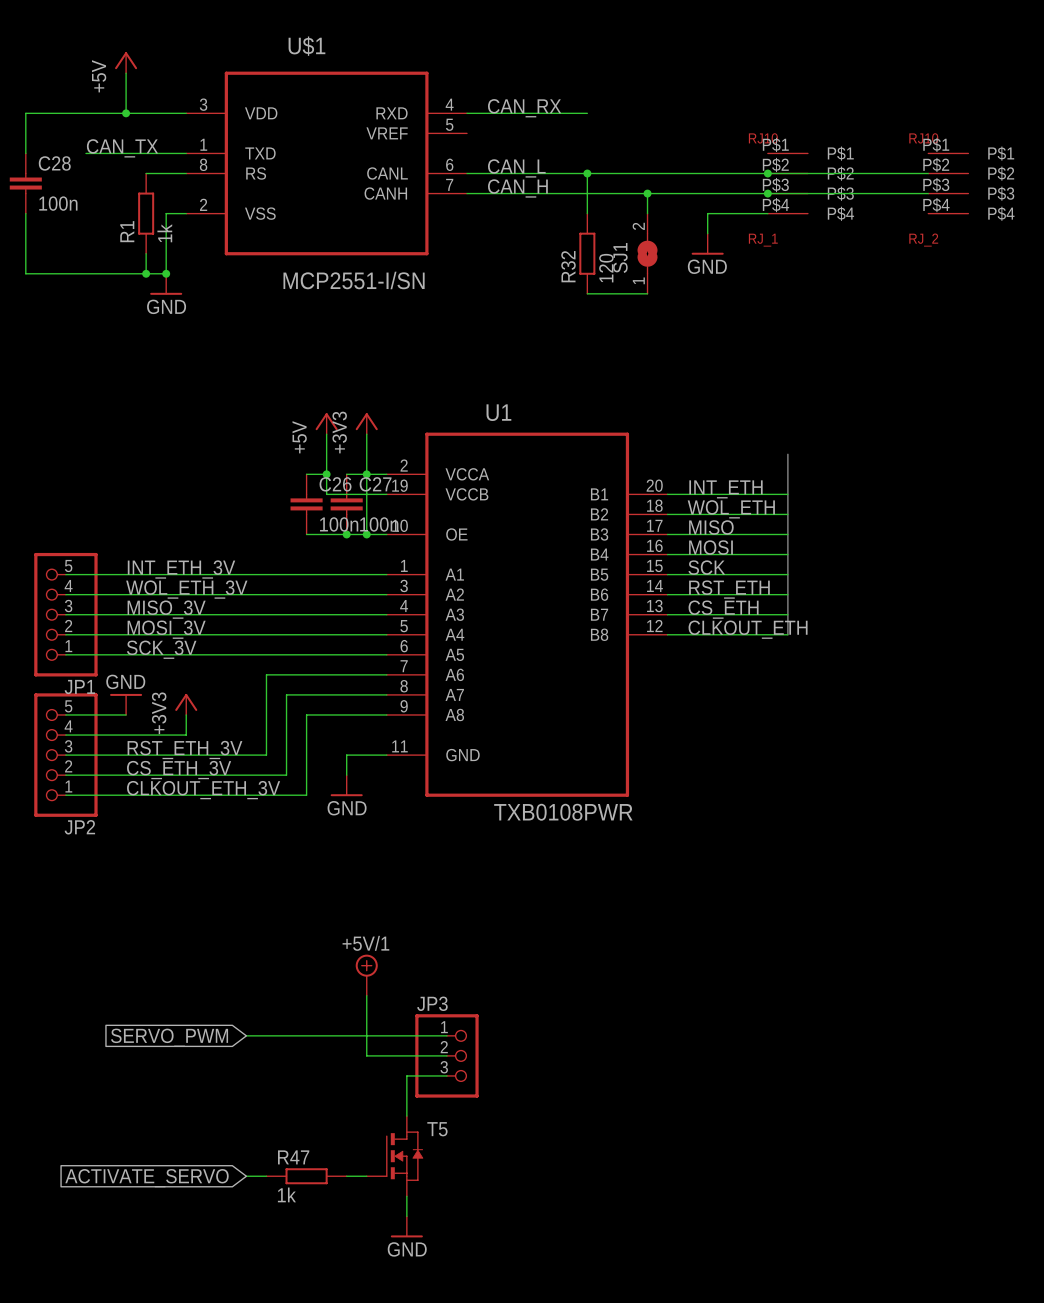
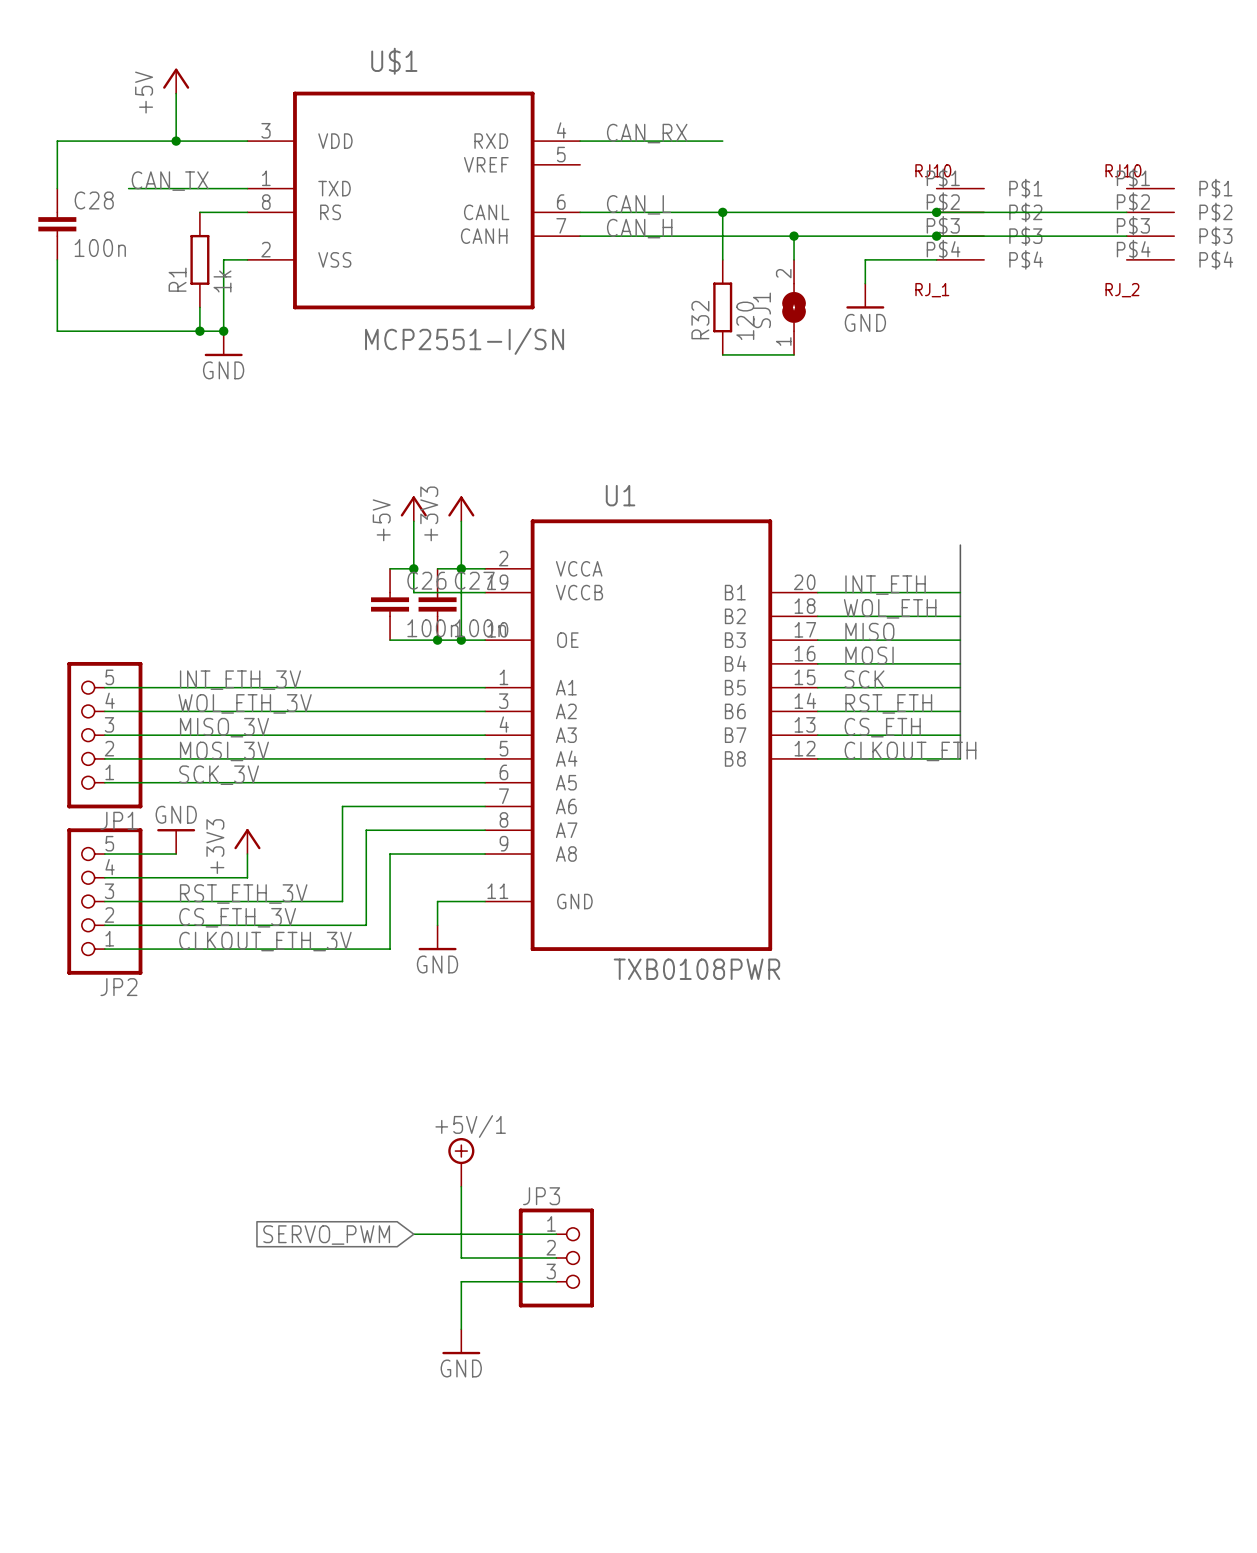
wire: (246, 1035) (326, 1035) -> none
global label position: SERVO_PWM (169, 1037) -> SERVO_PWM (326, 1235)
wire: (406, 1075) (406, 1116) -> (508, 1281) (461, 1281) (461, 1329)
T5: (395, 1156) -> none
wire: (246, 1176) (266, 1176) -> none
R47: 1k (306, 1176) -> none
wire: (346, 1176) (366, 1176) -> none
global label: ACTIVATE_SERVO (146, 1178) -> none
wire: (406, 1196) (406, 1216) -> none
power symbol position: GND (406, 1226) -> GND (461, 1341)

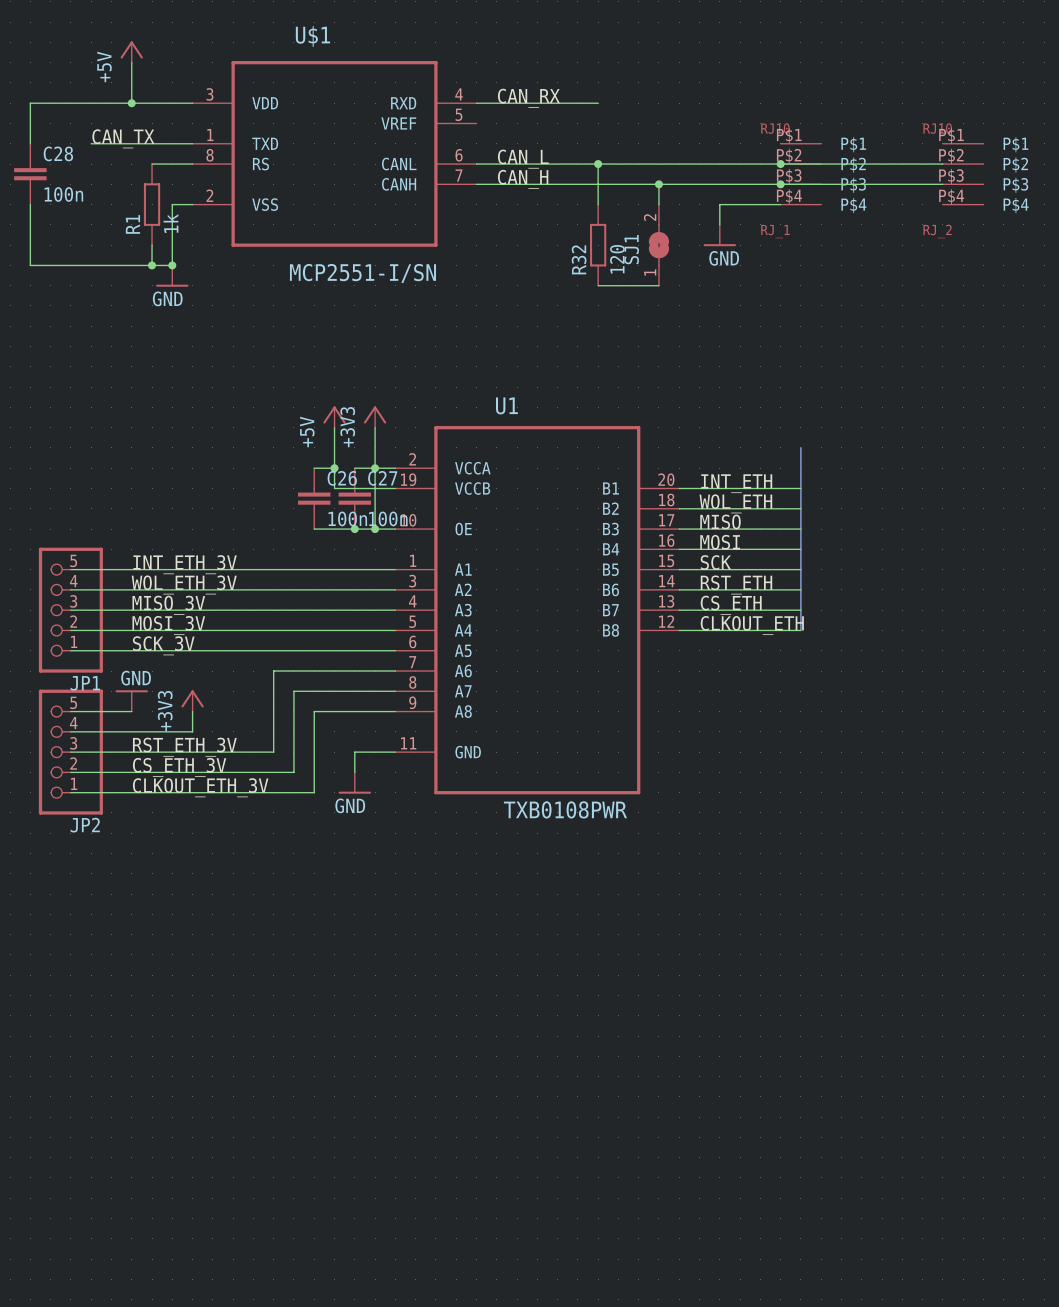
power symbol: +5V/1 (461, 1162) -> none
wire: (461, 1186) (461, 1257) (556, 1257) -> none
wire: (413, 1234) (556, 1234) -> none
global label: SERVO_PWM (326, 1235) -> none
JP3: (556, 1257) -> none
wire: (556, 1281) (461, 1281) (461, 1329) -> none
power symbol: GND (461, 1341) -> none

